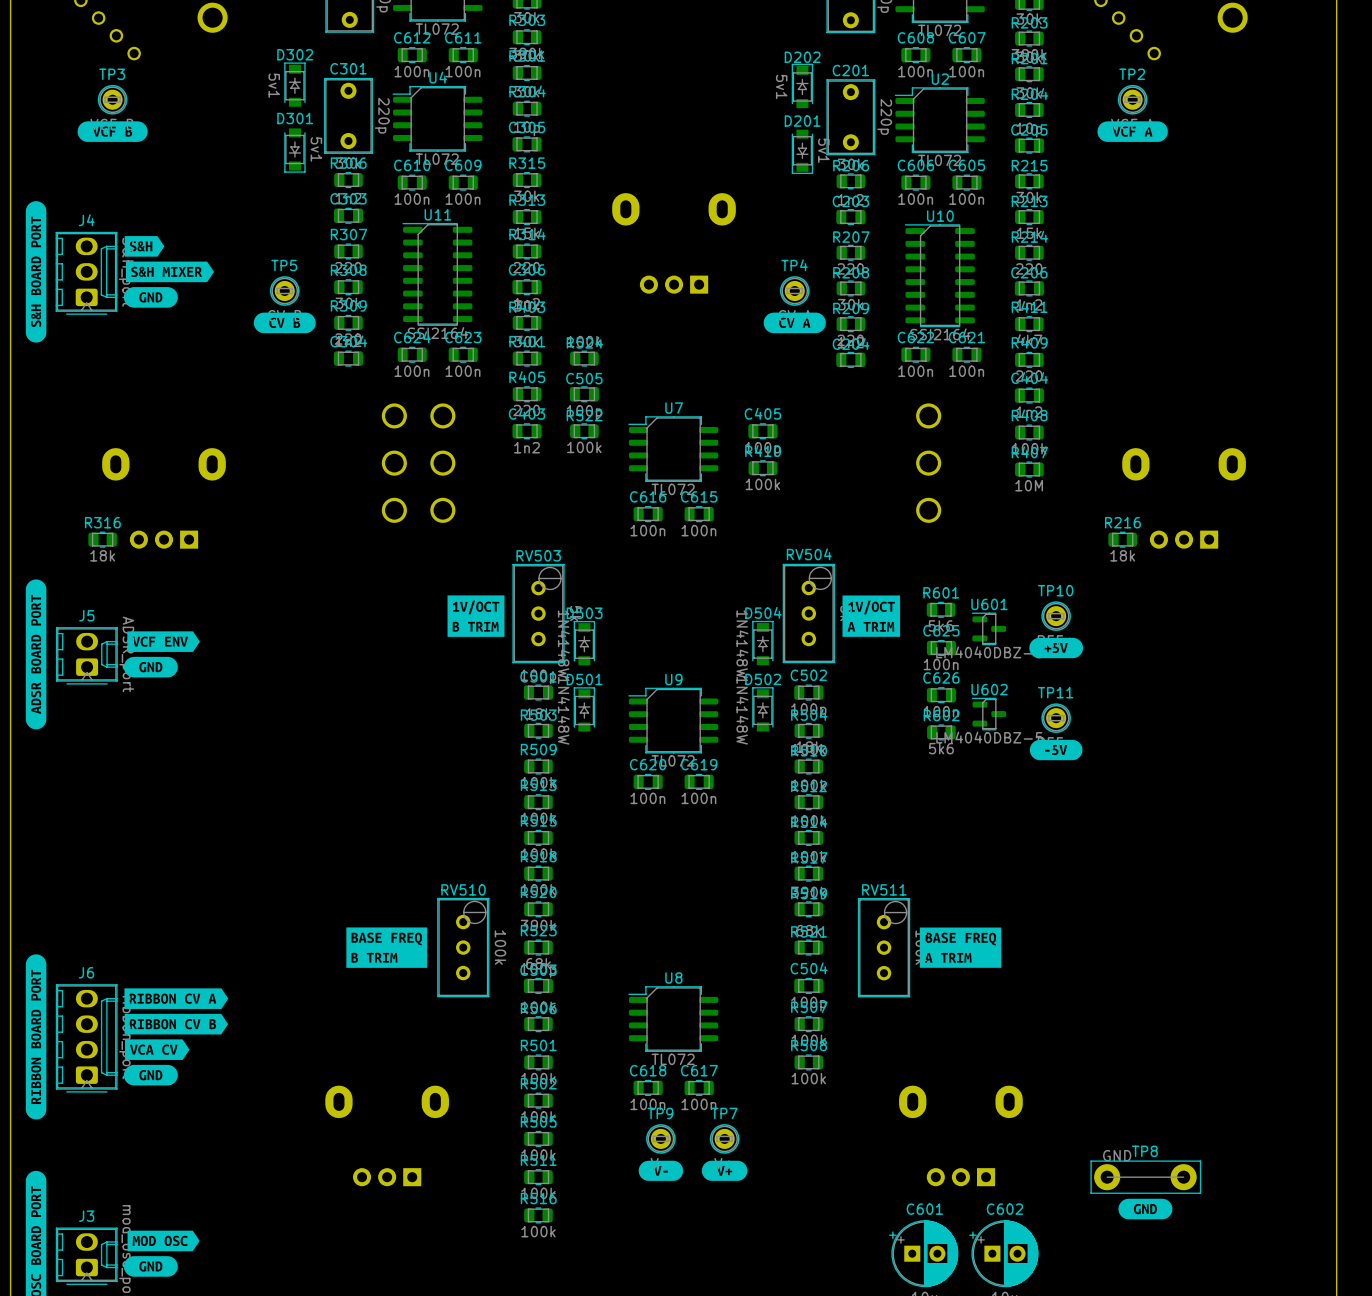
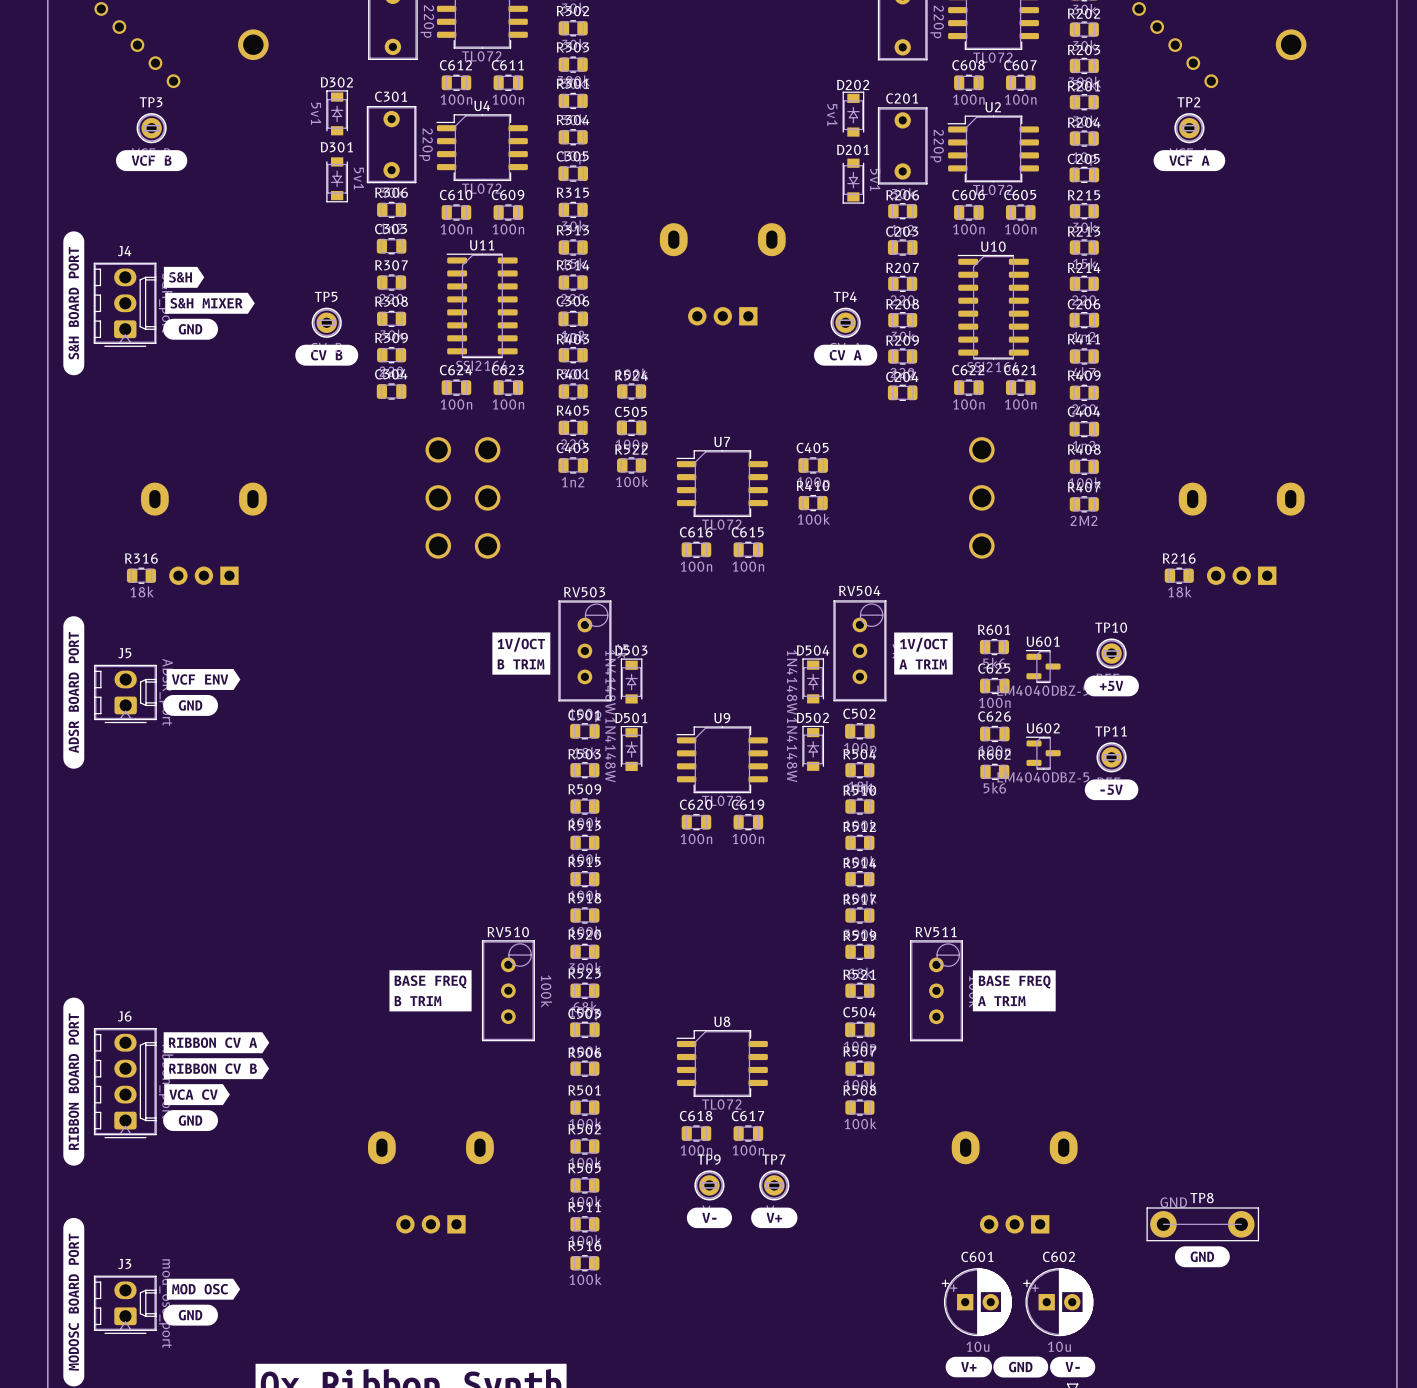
R407 value: 10M (1029, 485) -> 2M2 (1084, 520)

